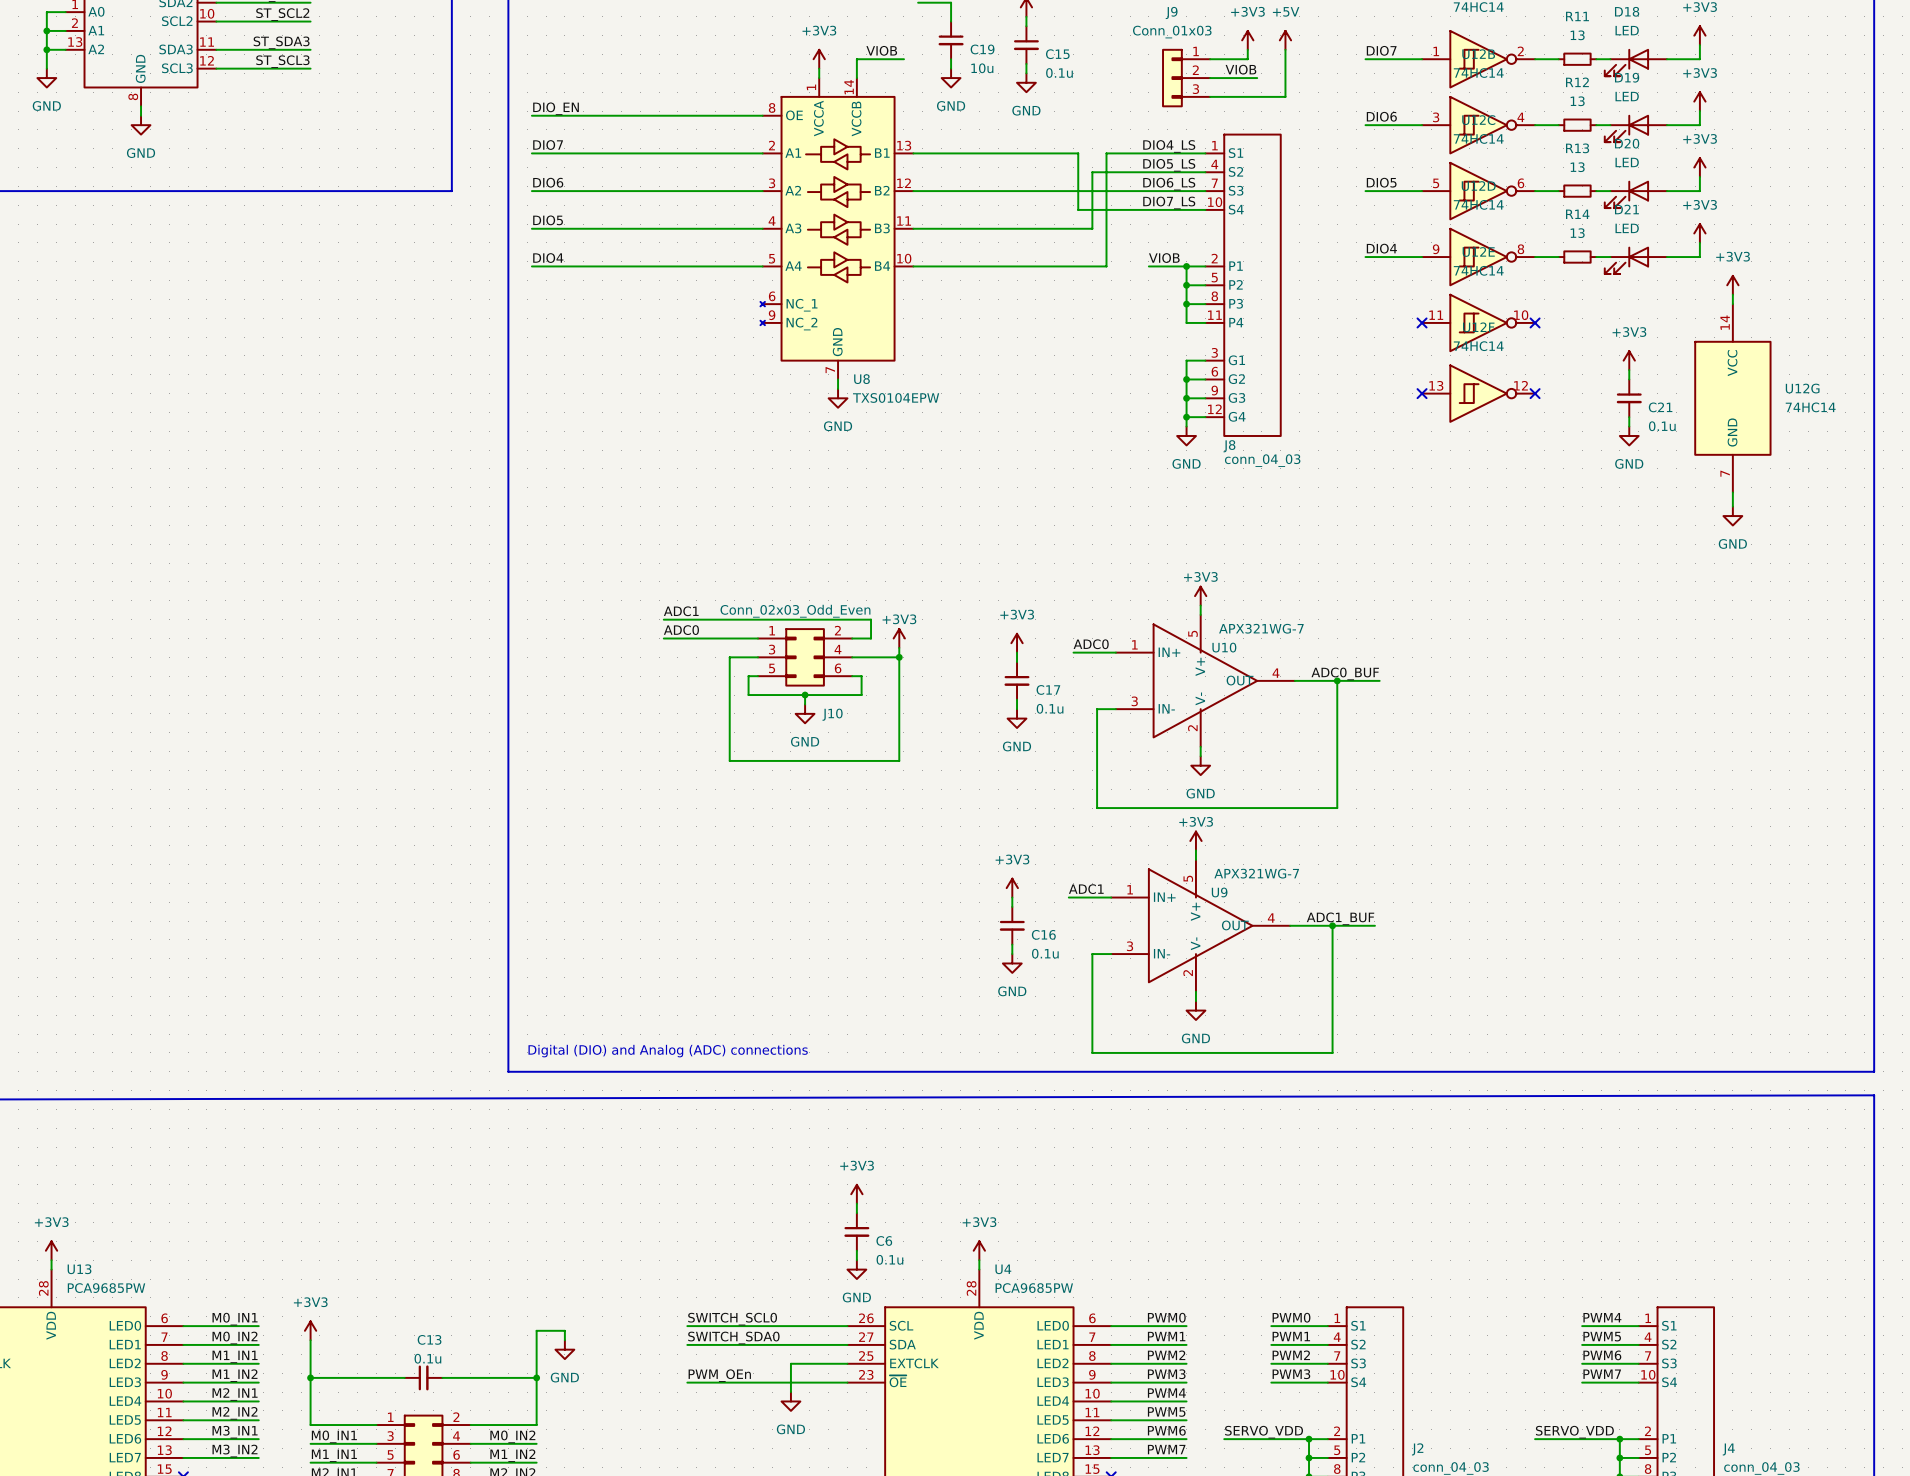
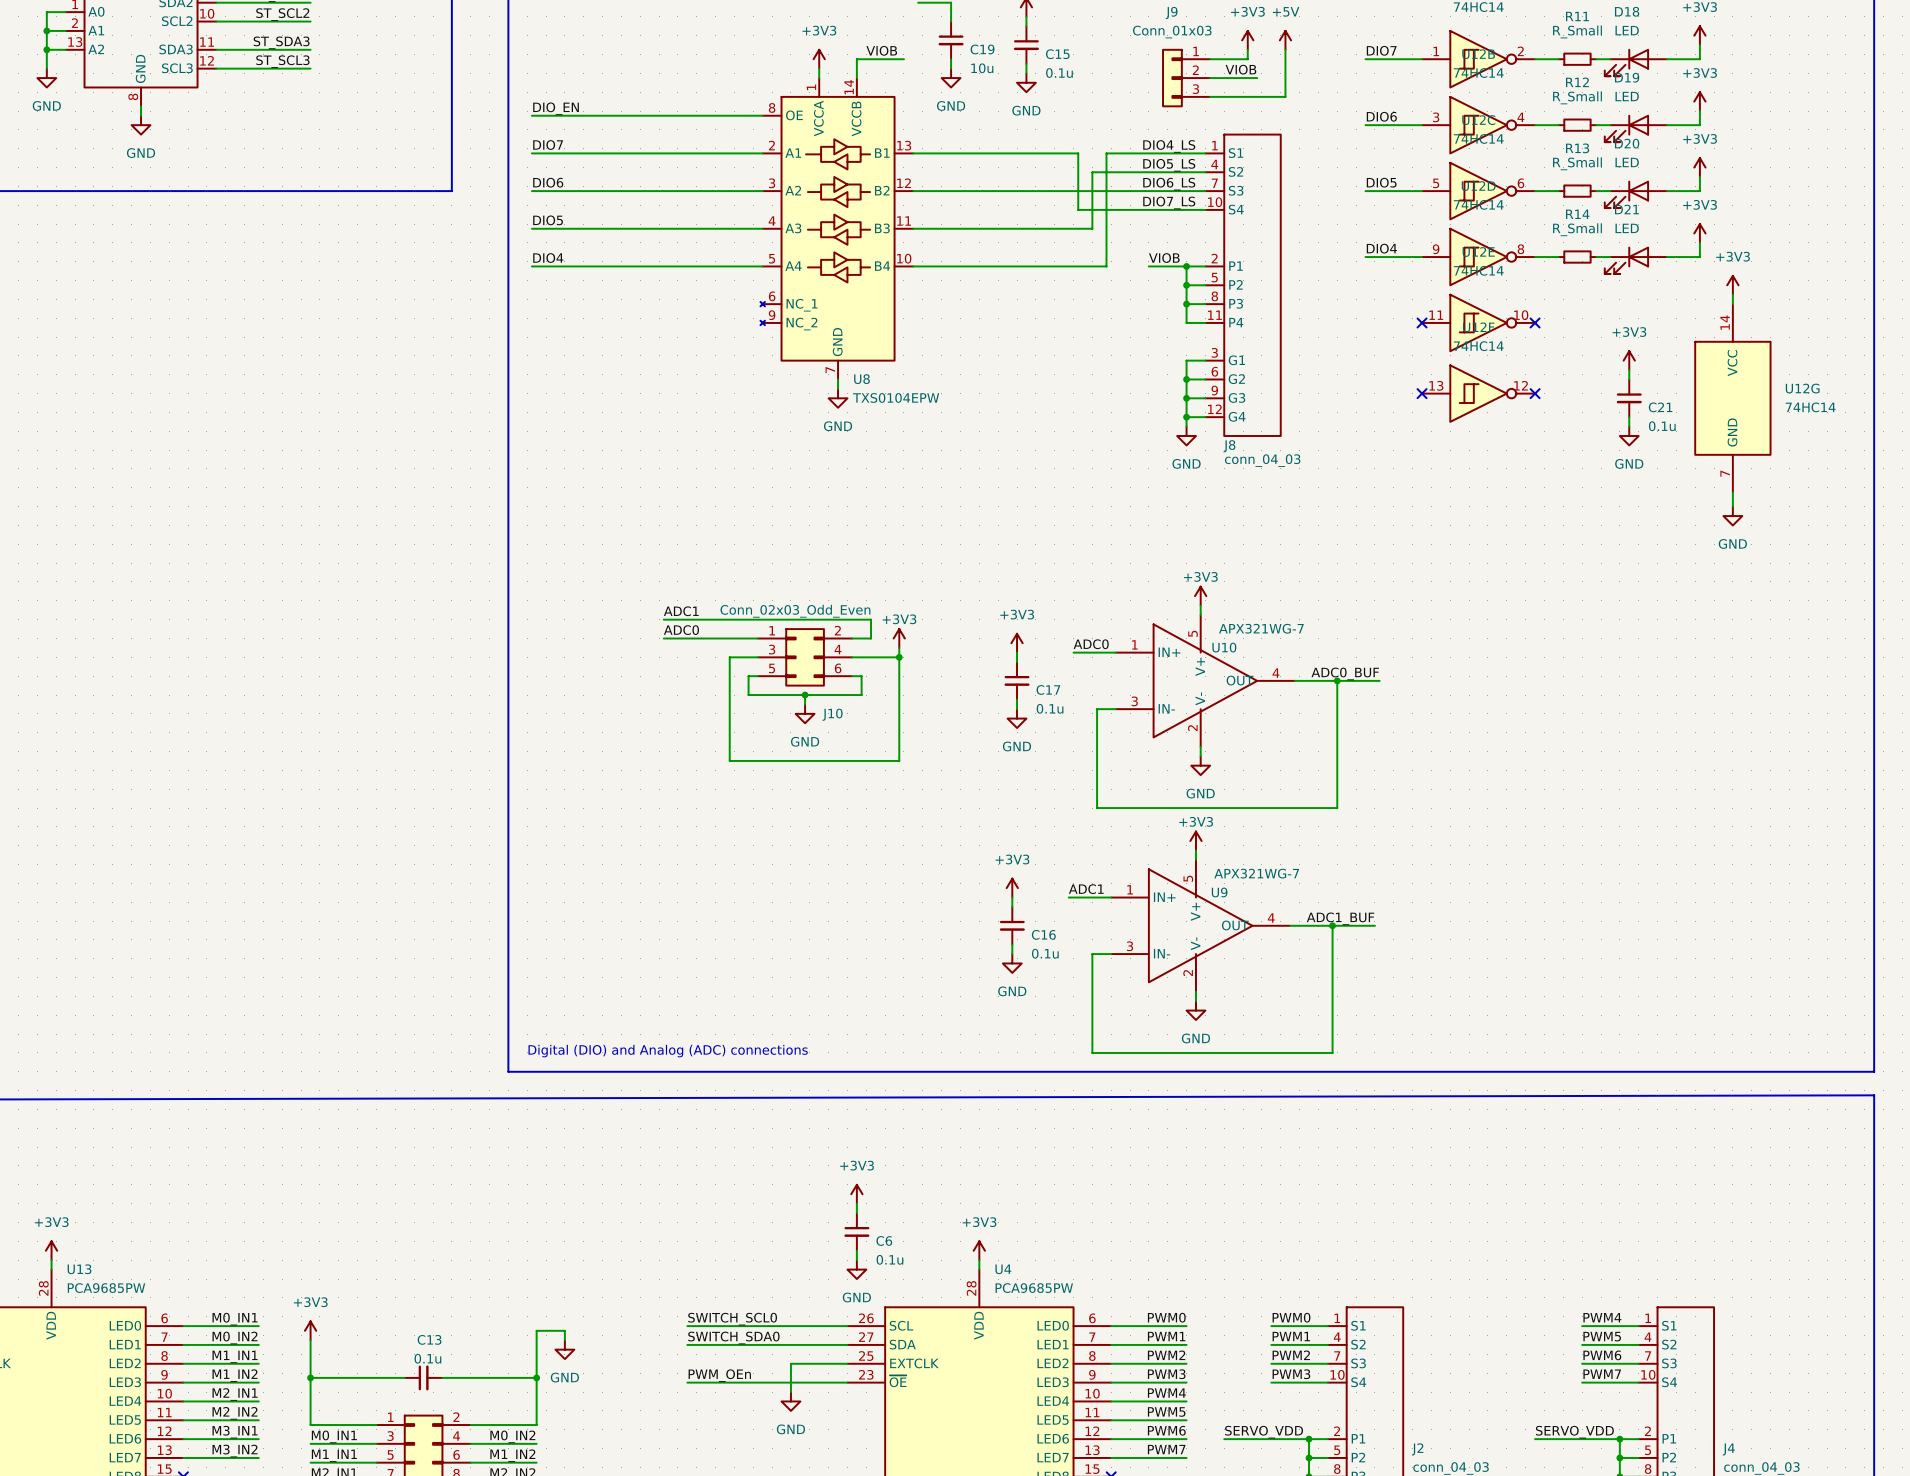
R11 value: 13 (1577, 35) -> R_Small (1577, 31)
R12 value: 13 (1577, 101) -> R_Small (1577, 97)
R13 value: 13 (1577, 167) -> R_Small (1577, 163)
R14 value: 13 (1577, 233) -> R_Small (1577, 229)

